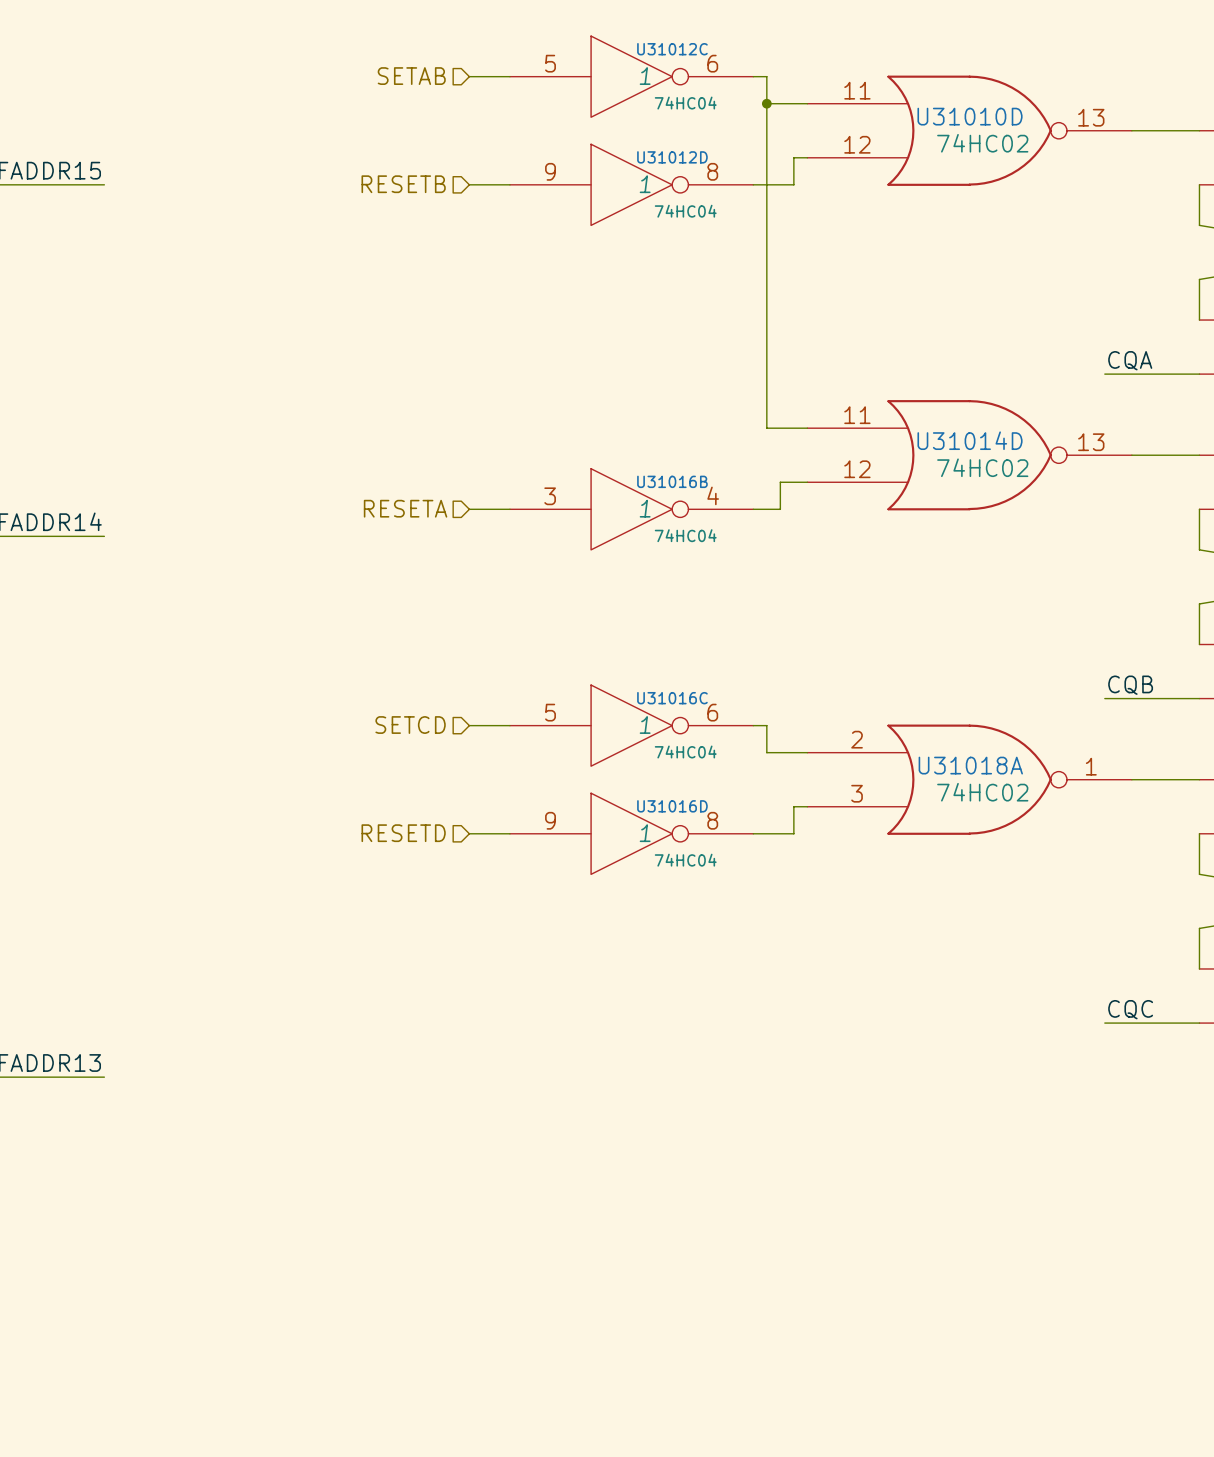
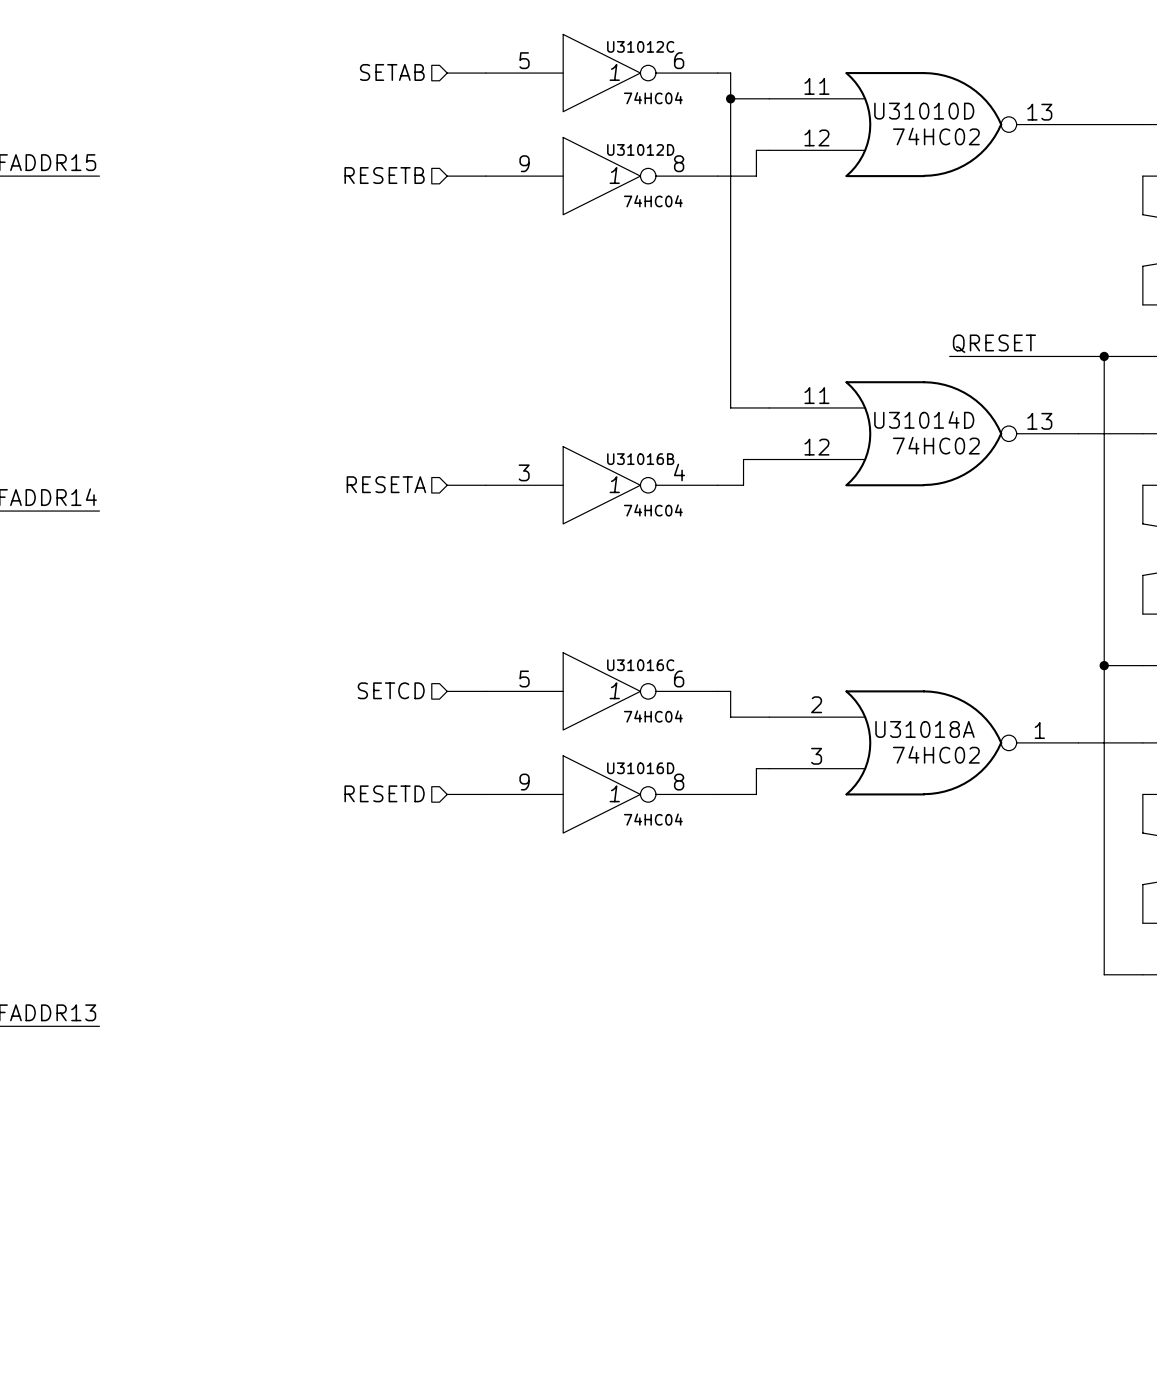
label: none -> QRESET (994, 343)
label: CQA (1130, 360) -> none
wire: none -> (949, 356) (1052, 356)
junction: none -> (1104, 356)
label: CQB (1130, 685) -> none
wire: (1104, 698) (1158, 698) -> none
junction: none -> (1104, 665)
label: CQC (1130, 1009) -> none
wire: (1104, 1023) (1158, 1023) -> (1104, 356) (1104, 974)

